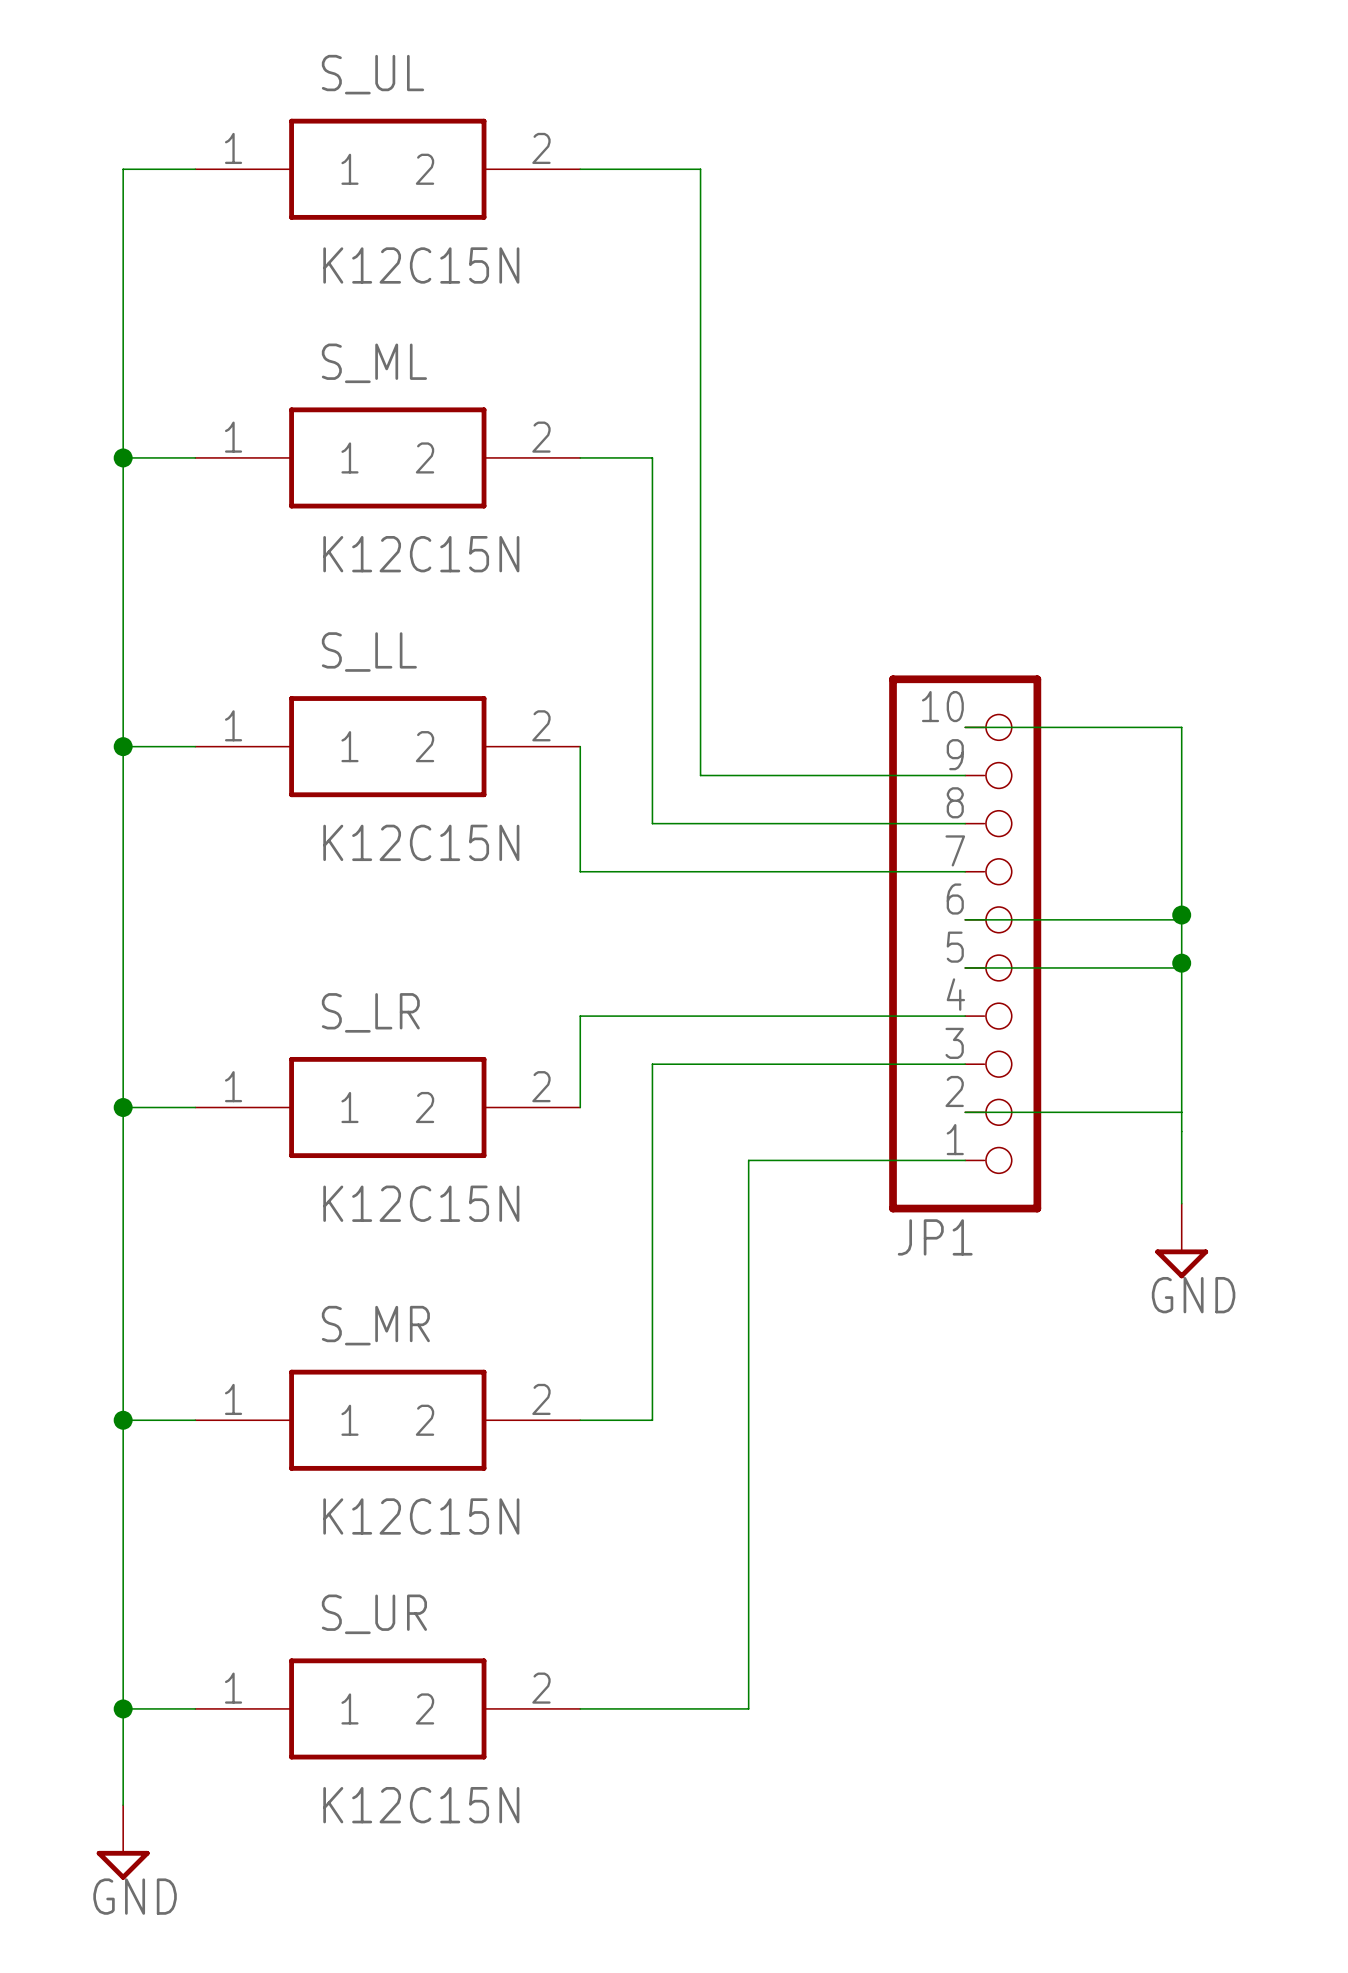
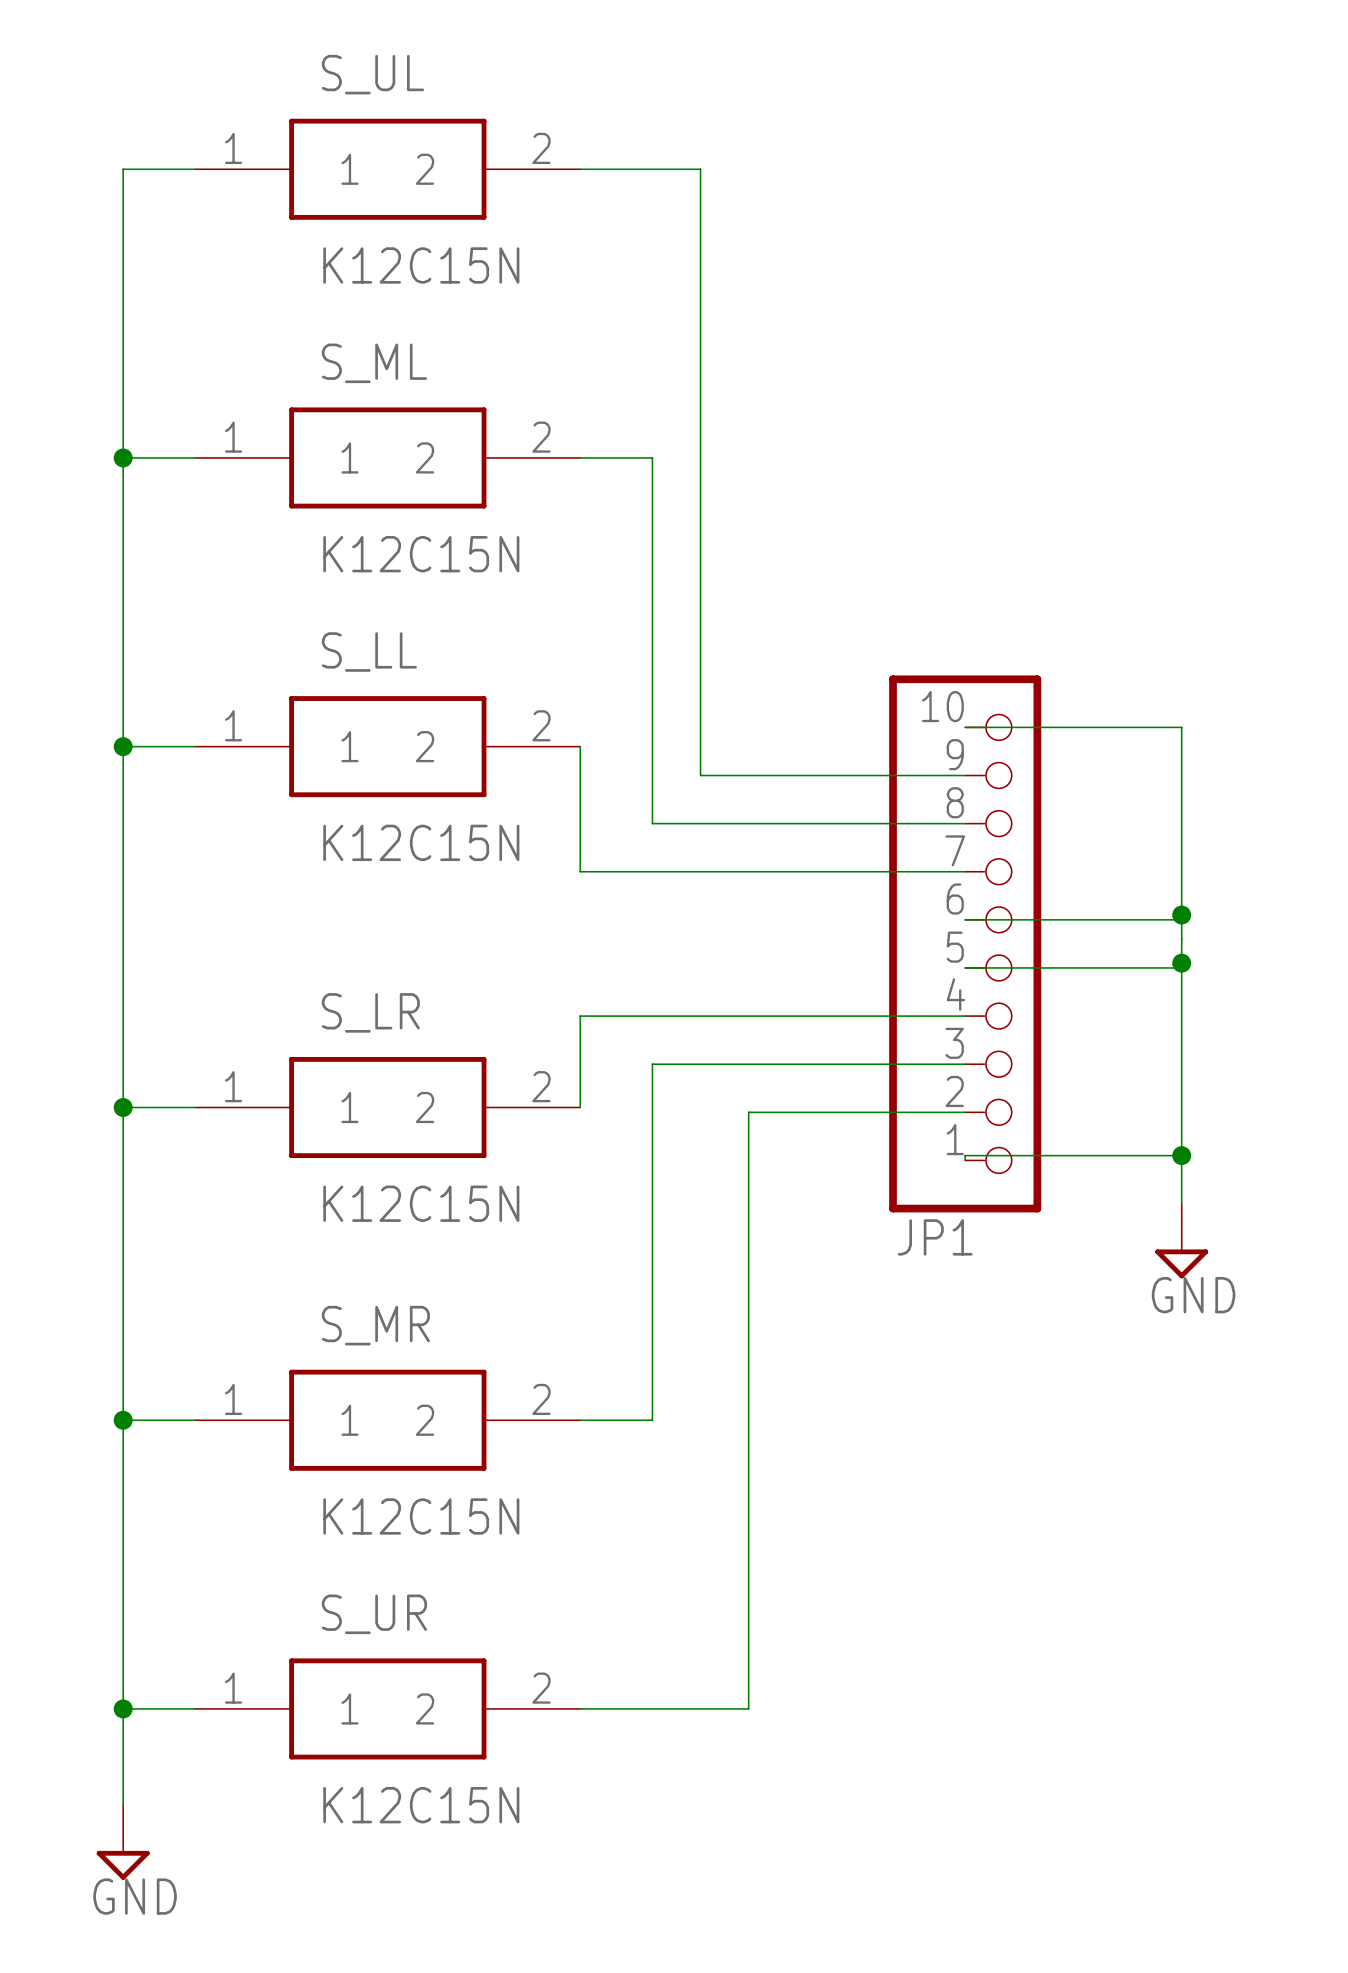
wire: (965, 1112) (1181, 1112) -> none
wire: none -> (1181, 1155) (965, 1155) (965, 1160)
junction: none -> (1181, 1155)
wire: (748, 1160) (965, 1160) -> (748, 1160) (748, 1112) (965, 1112)

